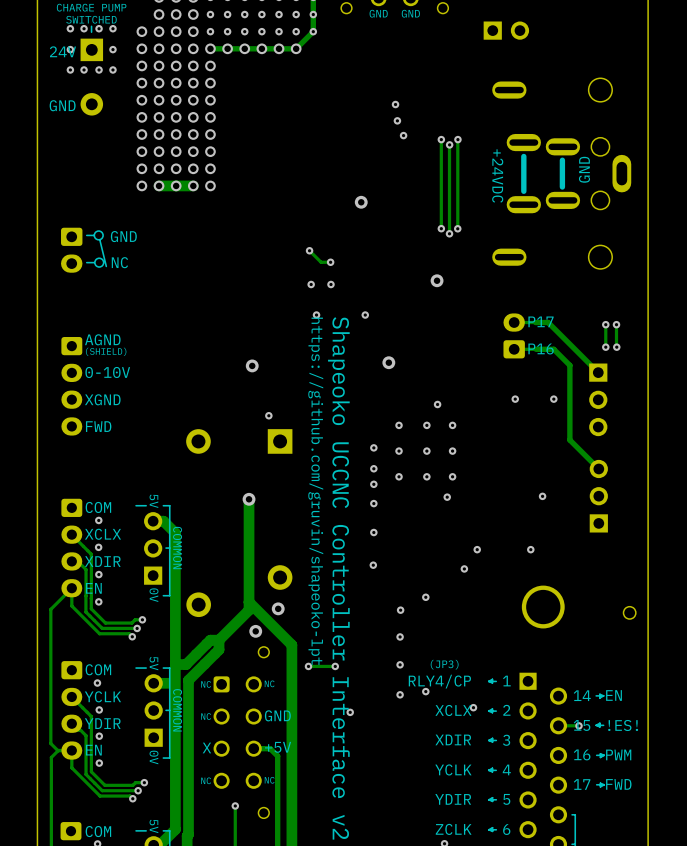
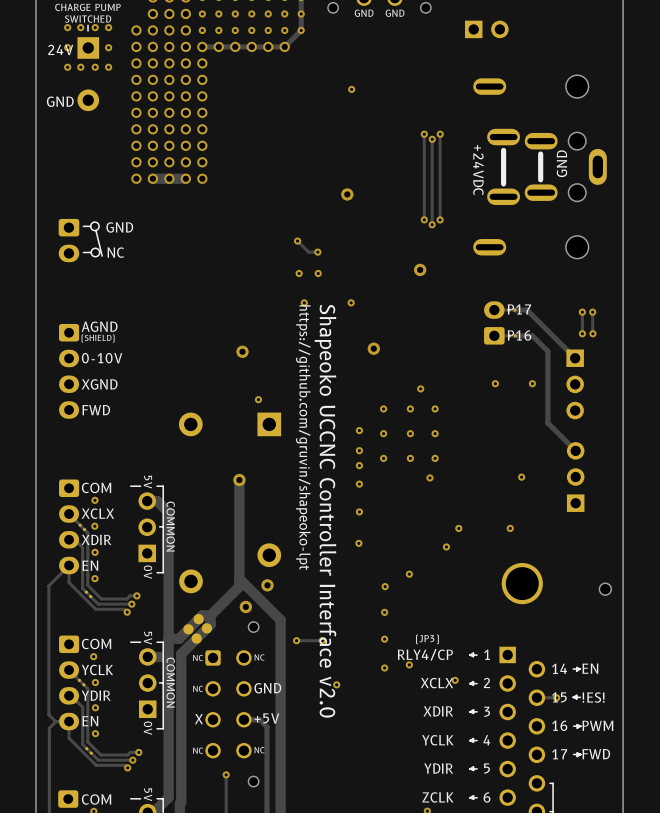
via: none -> (351, 89)
via: (395, 104) -> none
via: (397, 120) -> none
via: (403, 135) -> none

